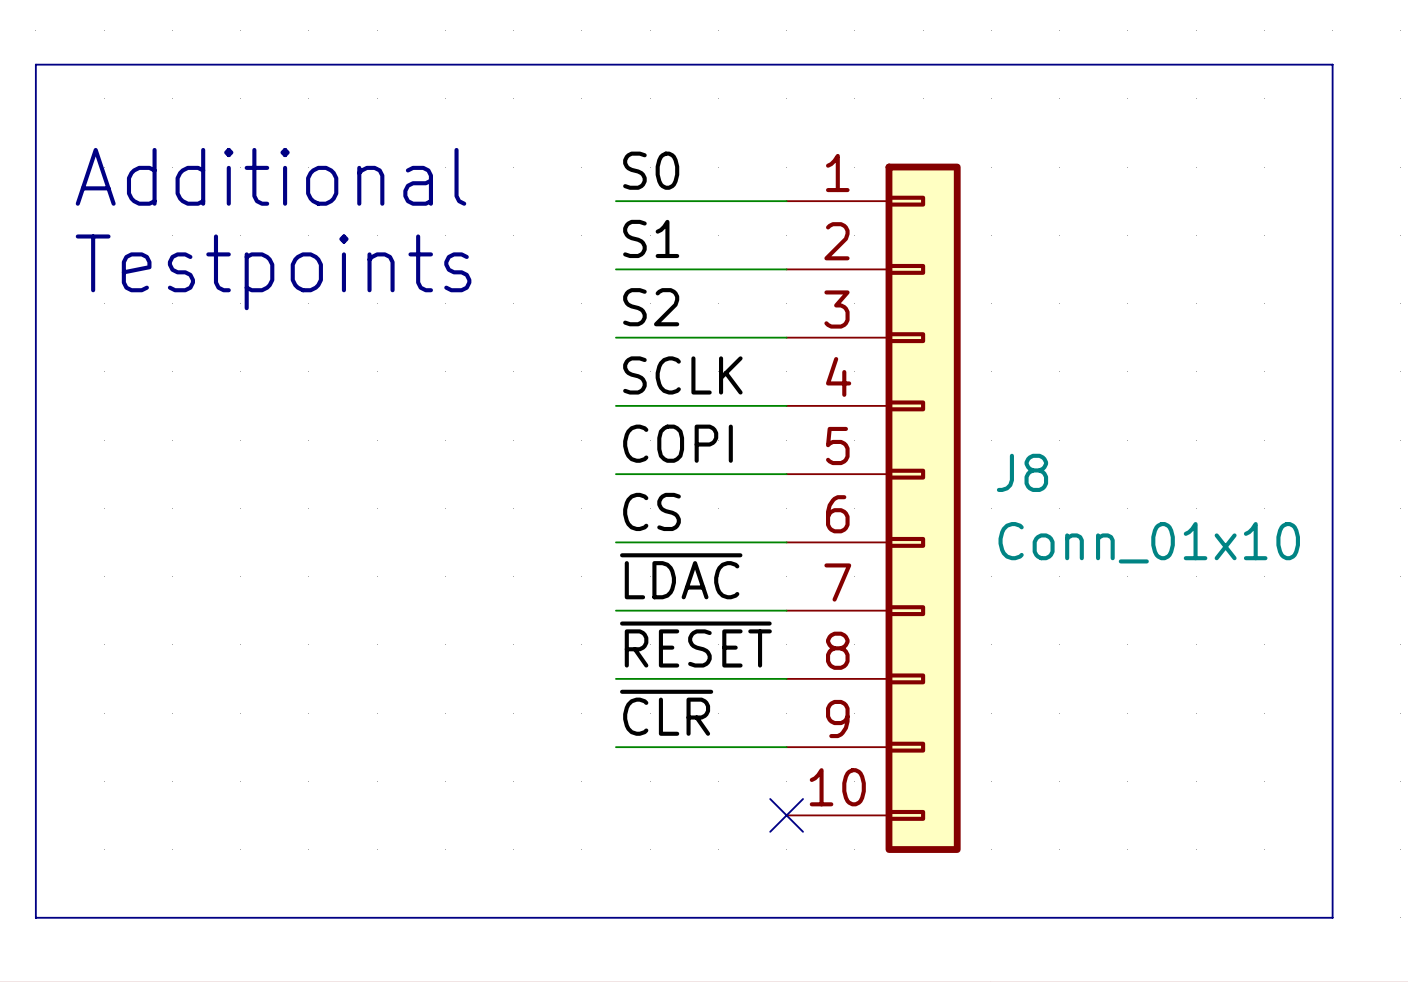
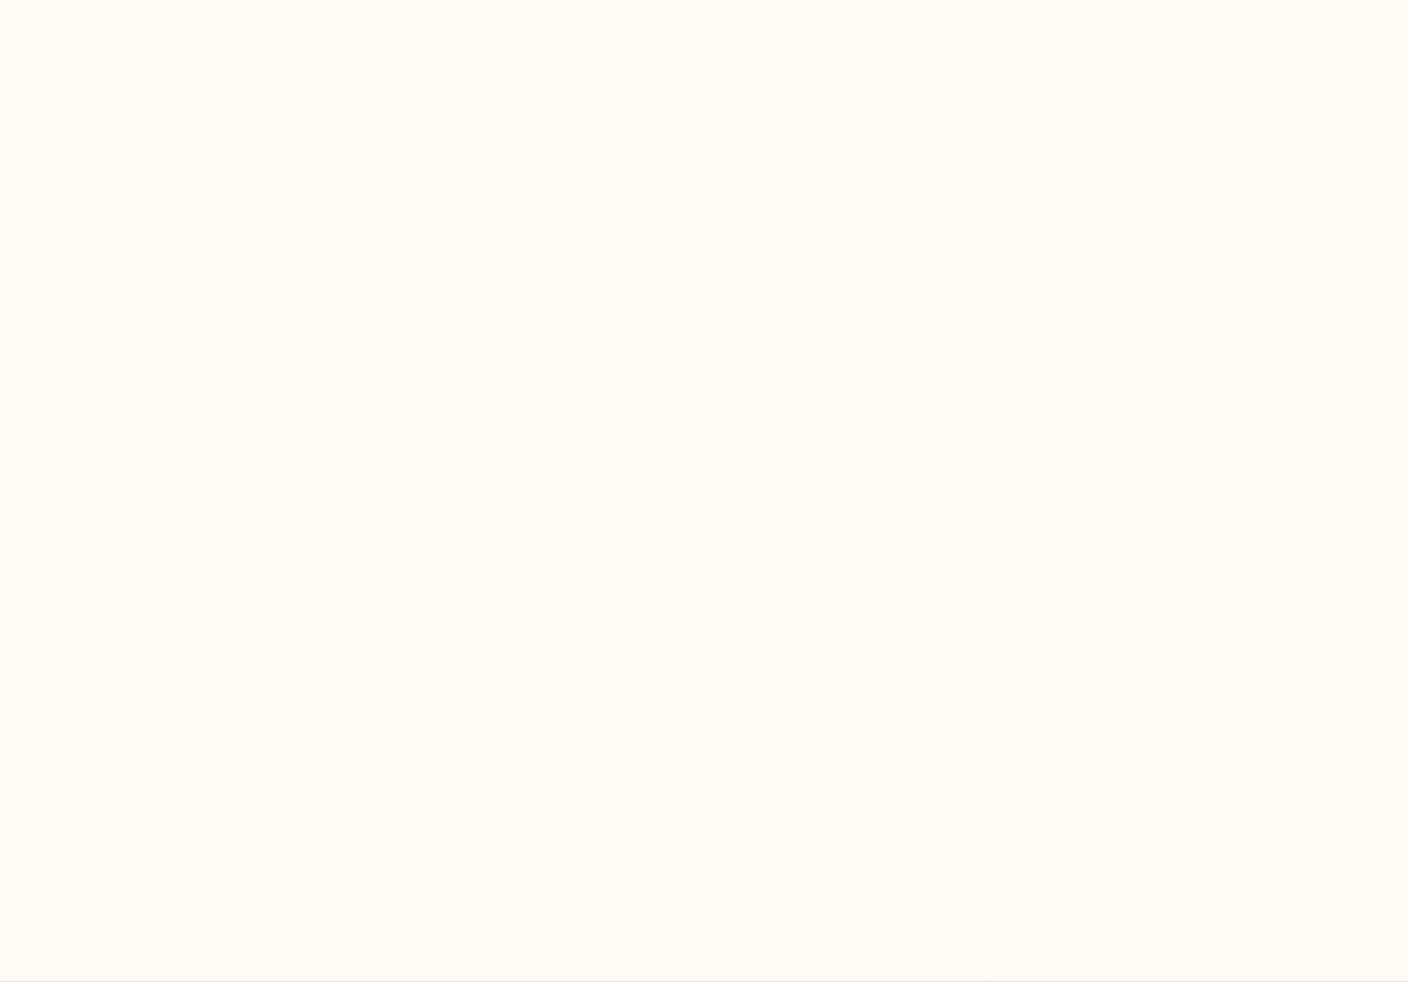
line: (35, 64) (1332, 64) (1332, 917) (35, 917) (35, 64) -> none
label: S0 (651, 170) -> none
text: Additional (271, 176) -> none
wire: (615, 201) (786, 201) -> none
label: S1 (651, 238) -> none
wire: (615, 269) (786, 269) -> none
text: Testpoints (273, 272) -> none
label: S2 (651, 307) -> none
wire: (615, 337) (786, 337) -> none
label: SCLK (682, 375) -> none
wire: (615, 405) (786, 405) -> none
label: COPI (677, 443) -> none
wire: (615, 474) (786, 474) -> none
J8: Conn_01x10 (873, 508) -> none
label: CS (651, 511) -> none
wire: (615, 542) (786, 542) -> none
label: ~{LDAC} (681, 576) -> none
wire: (615, 610) (786, 610) -> none
label: ~{RESET} (695, 644) -> none
wire: (615, 678) (786, 678) -> none
label: ~{CLR} (666, 712) -> none
wire: (615, 747) (786, 747) -> none
no-connect mark: (786, 815) -> none

